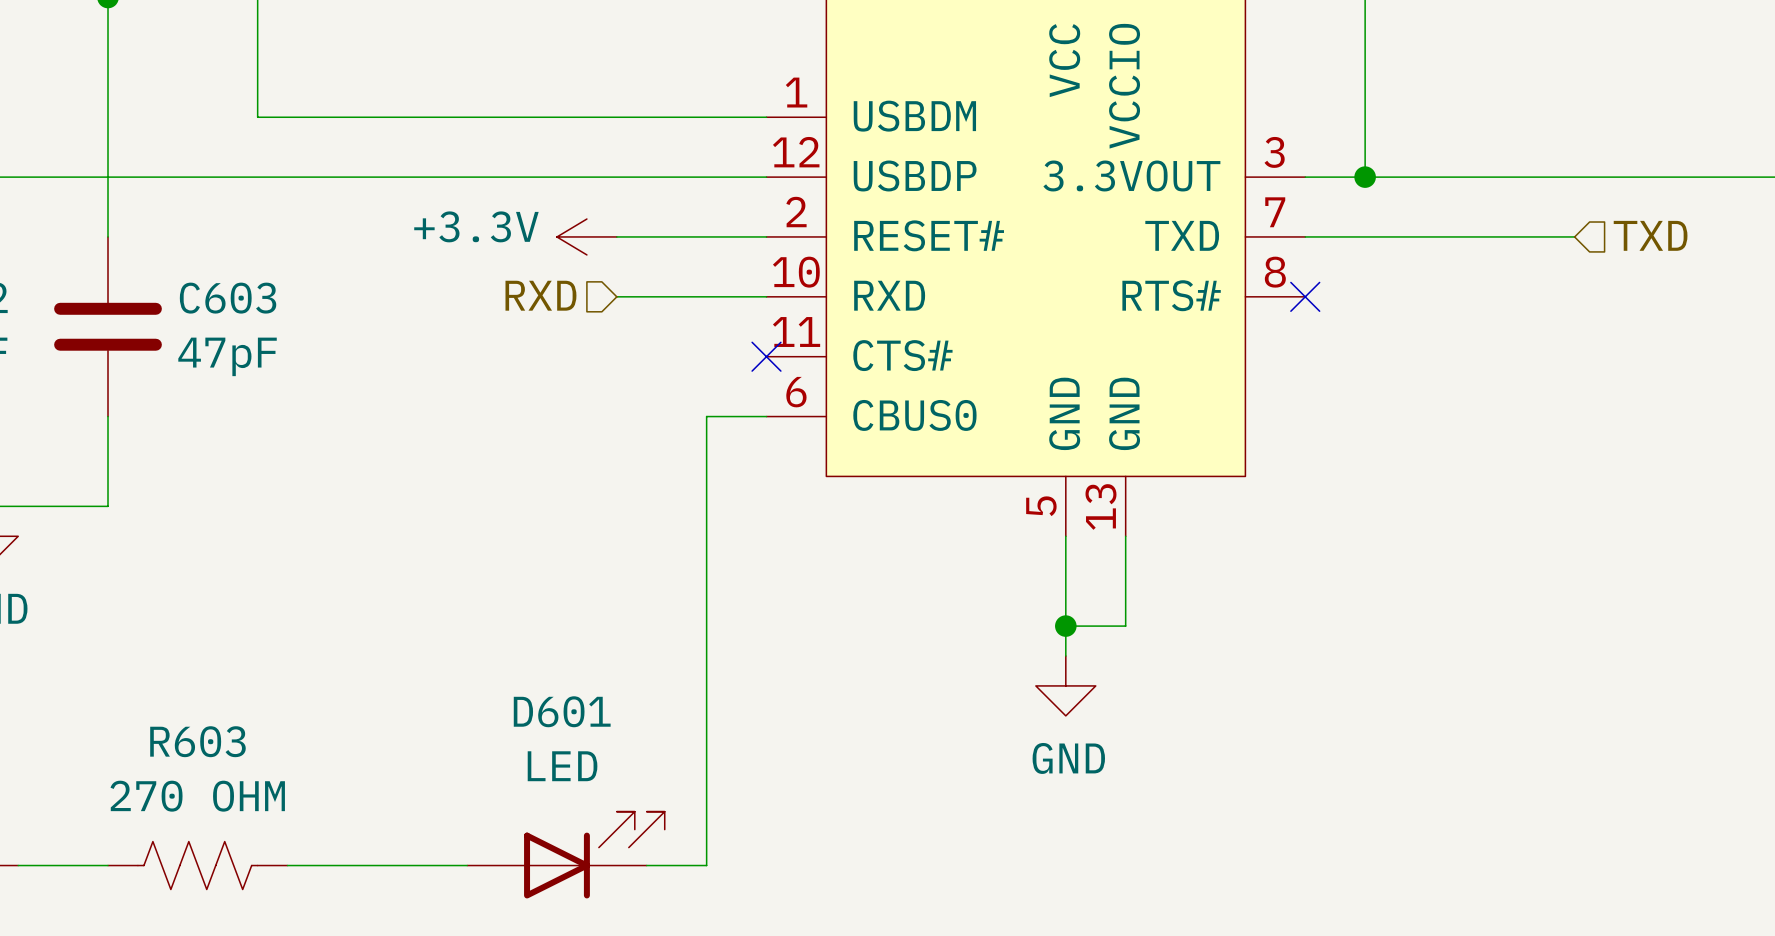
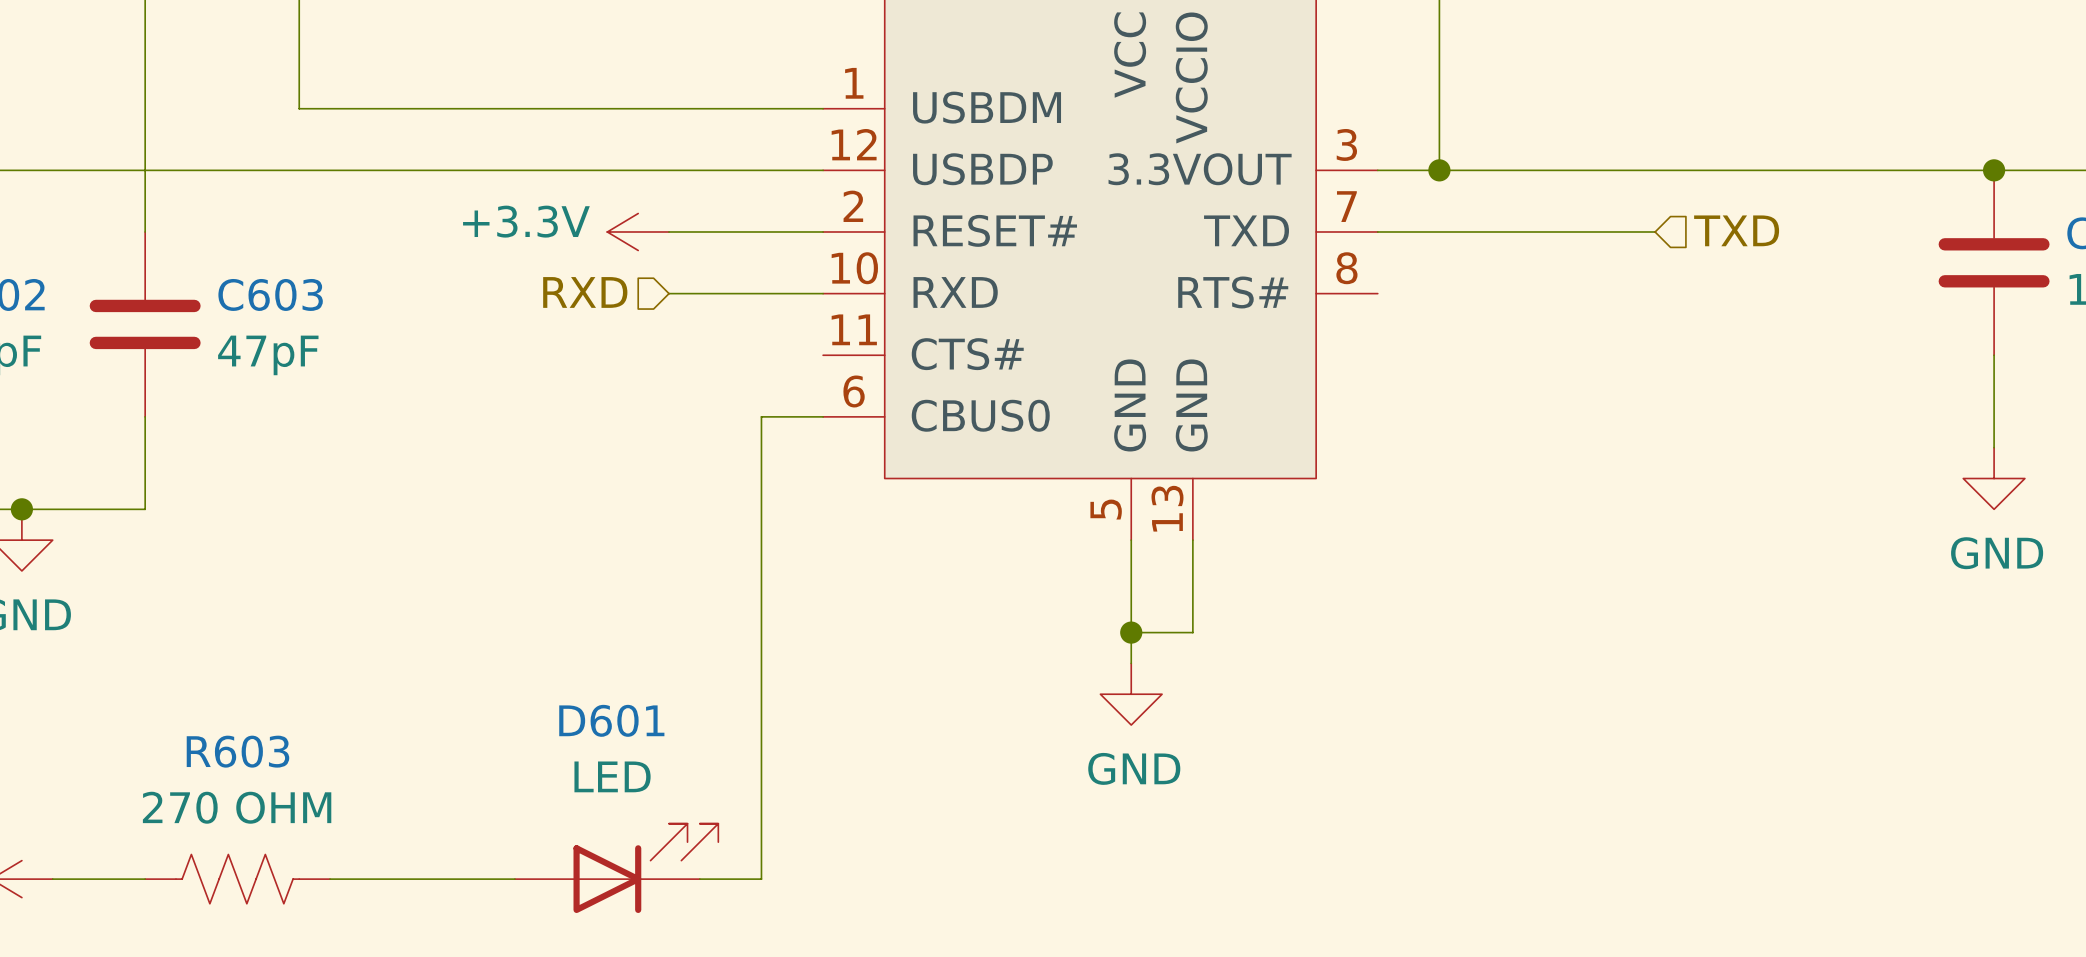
no-connect mark: (1305, 296) -> none
no-connect mark: (766, 356) -> none

